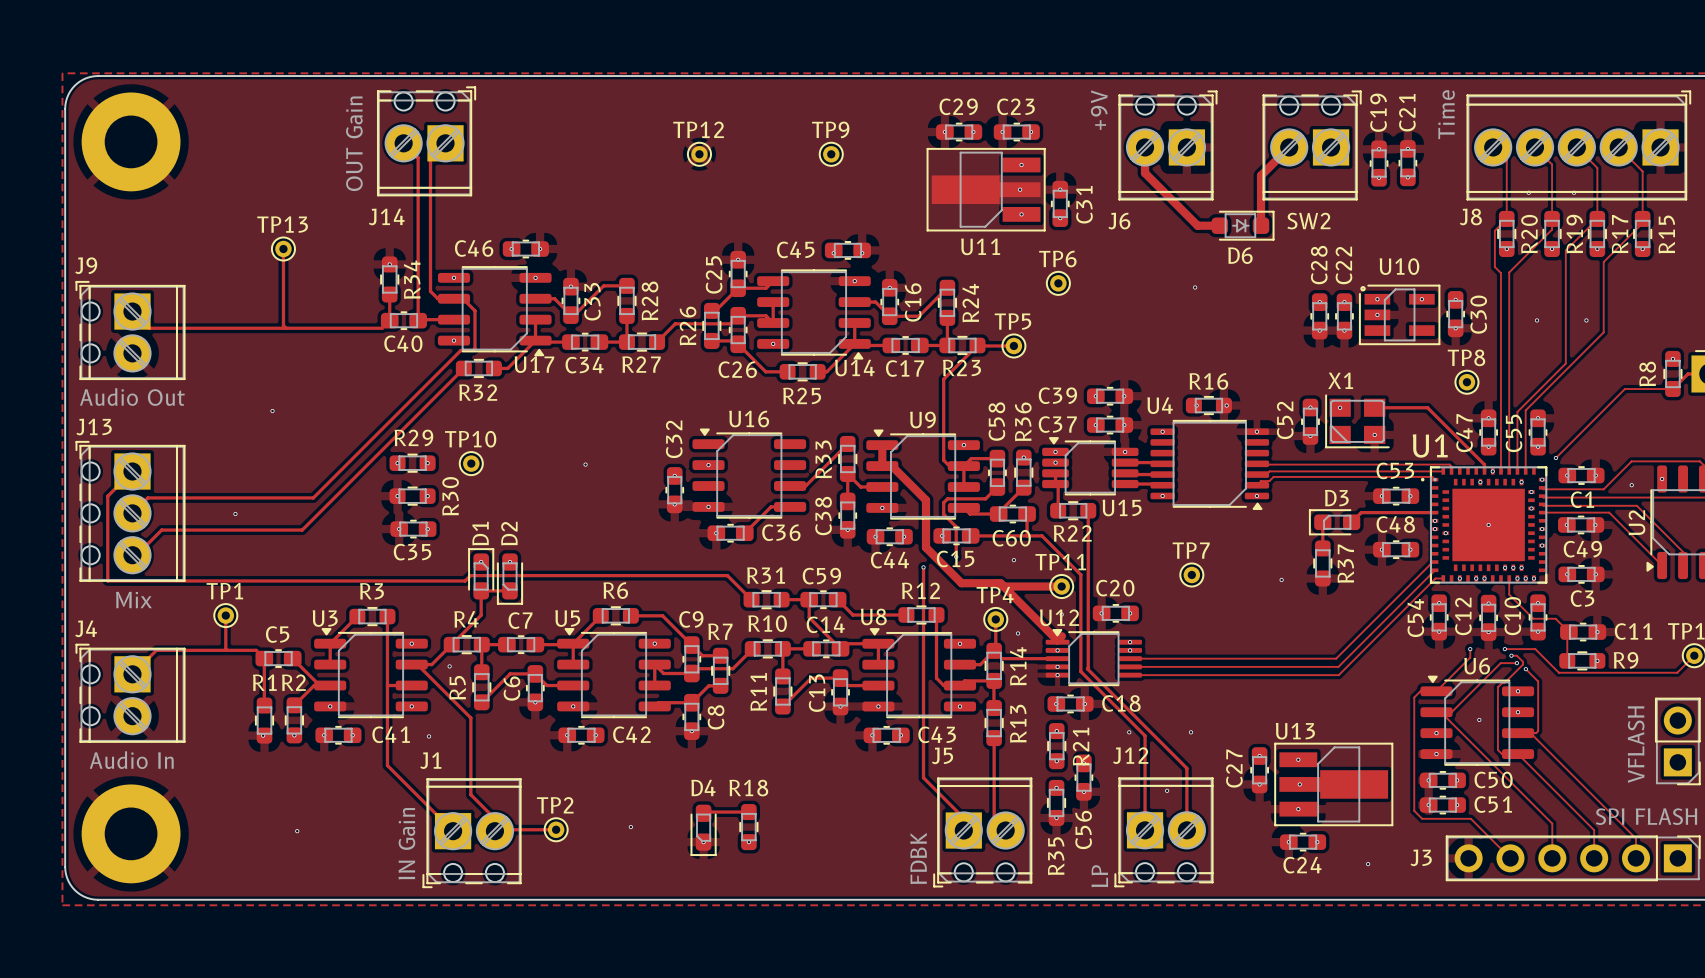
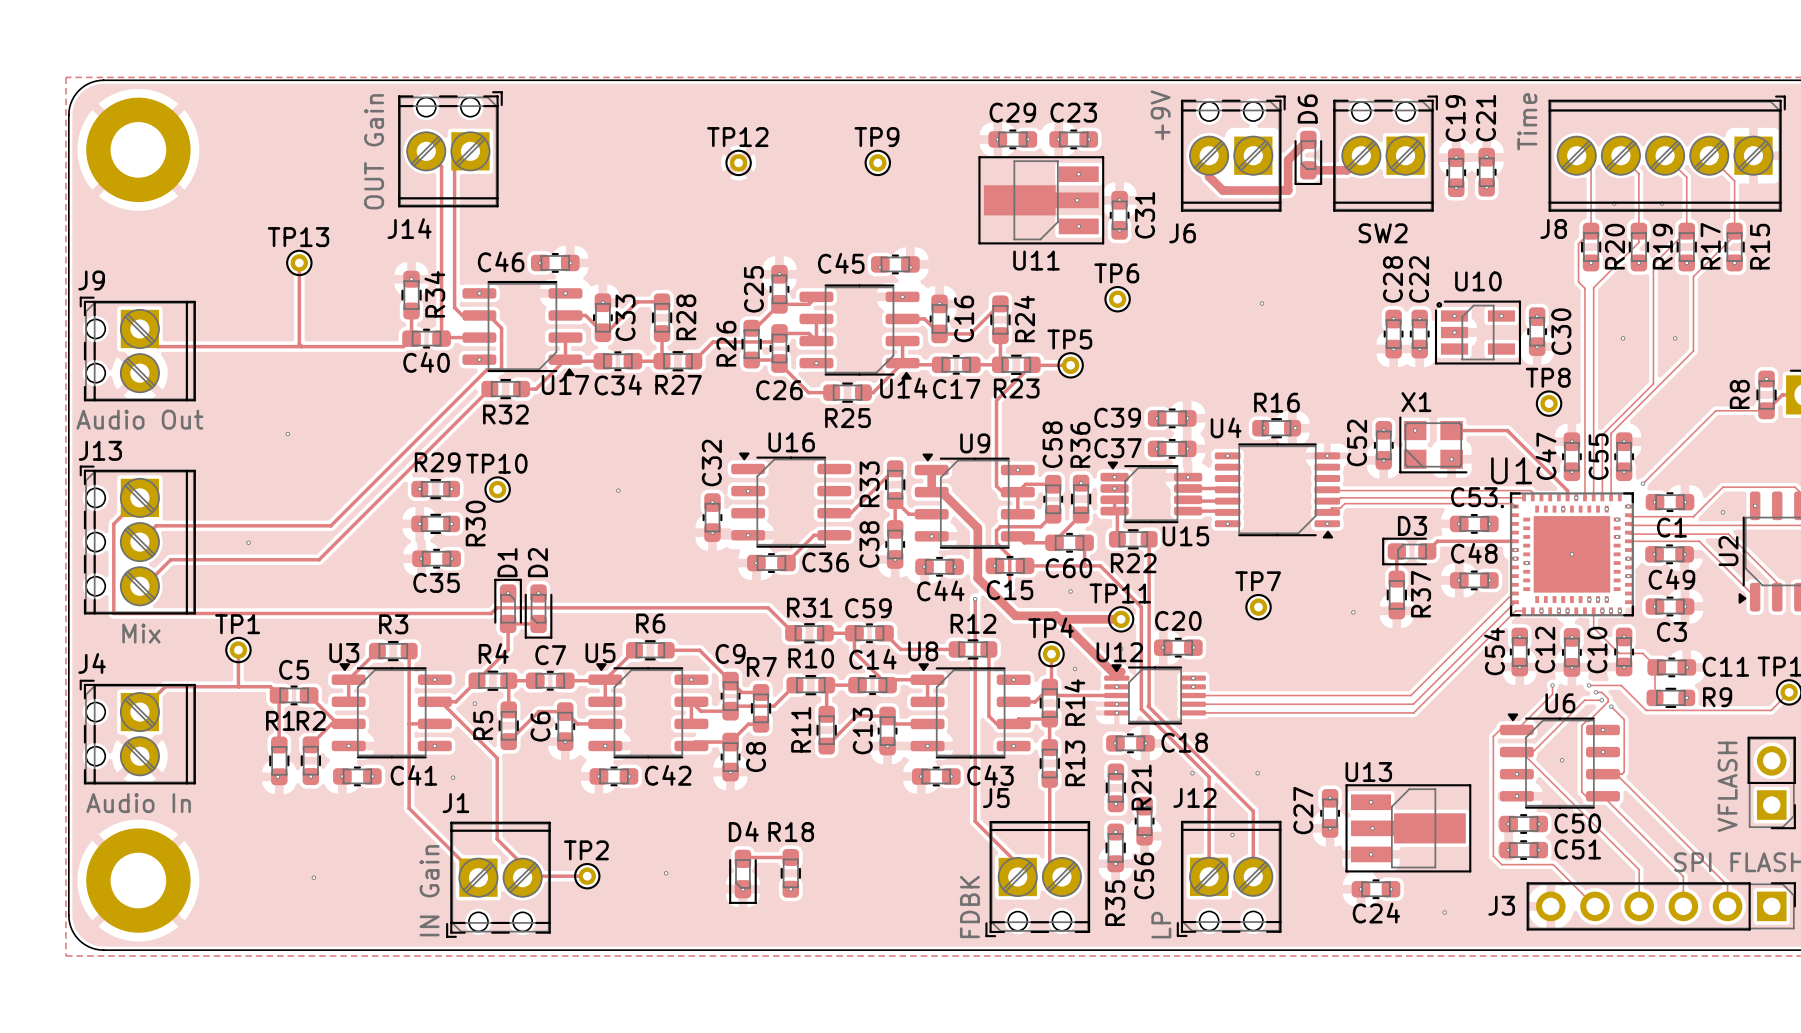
track: (1275, 161) (1261, 175) (1261, 225) -> (1346, 170) (1308, 170)
track: (1145, 167) (1145, 173) (1197, 225) (1219, 225) -> (1209, 176) (1222, 190) (1288, 190) (1288, 160) (1308, 139)
D6 footprint: [1211, 210, 1275, 241] -> [1294, 130, 1323, 186]
D6 name position: D6 (1240, 255) -> D6 (1307, 109)

